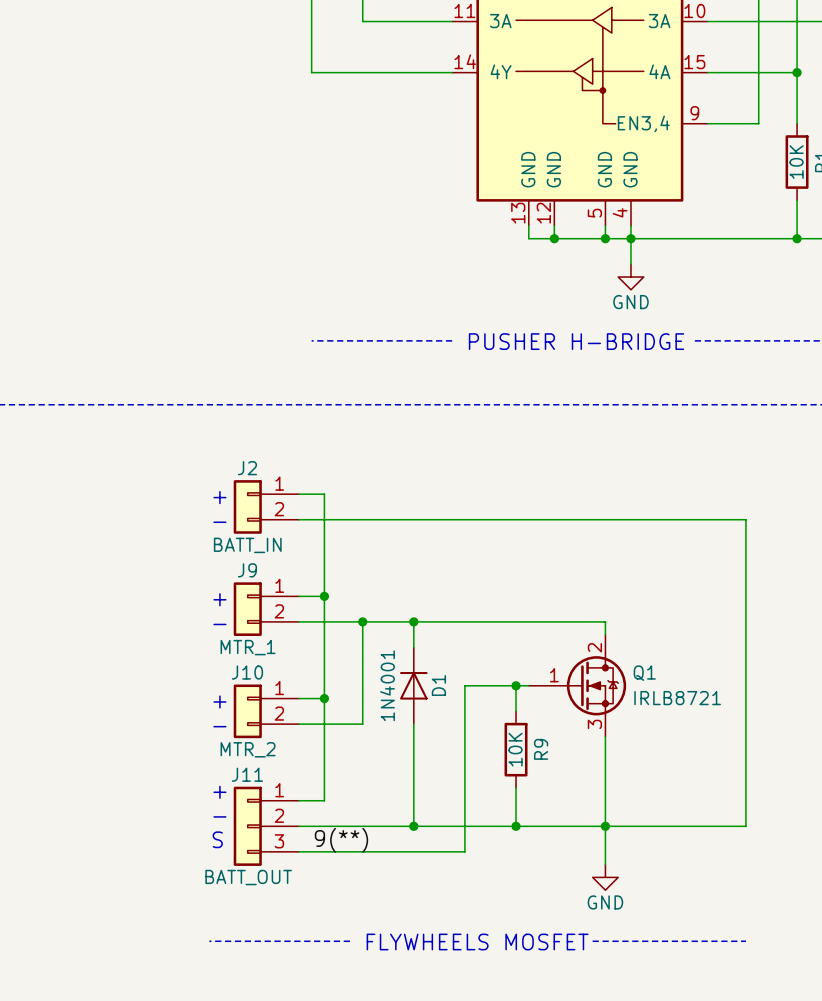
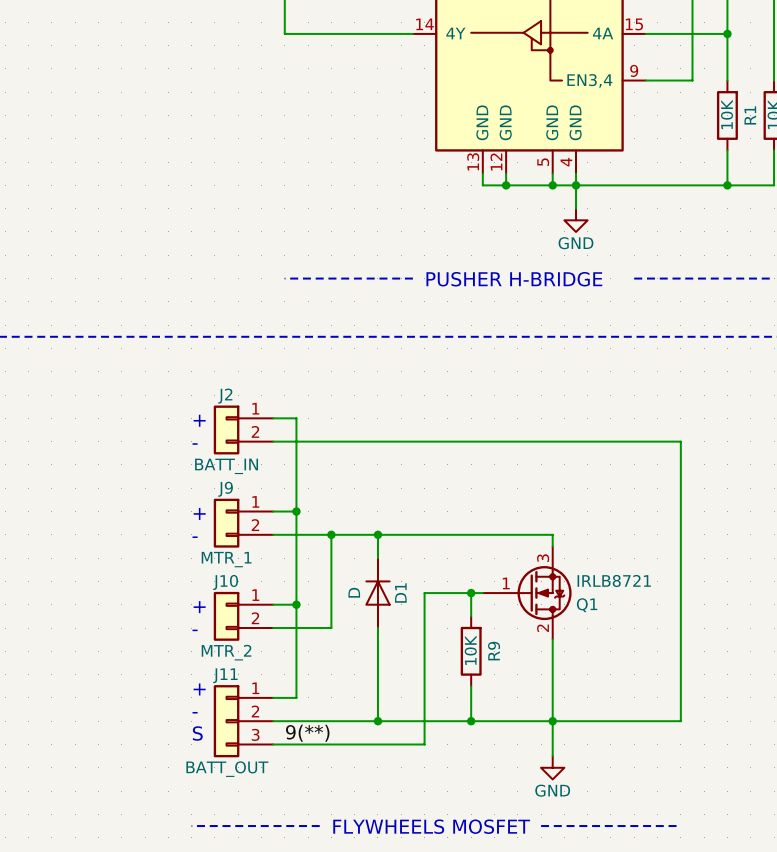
D1 value: 1N4001 (387, 685) -> D (354, 592)
Q1 flip: as is (596, 685) -> up-down (544, 593)

